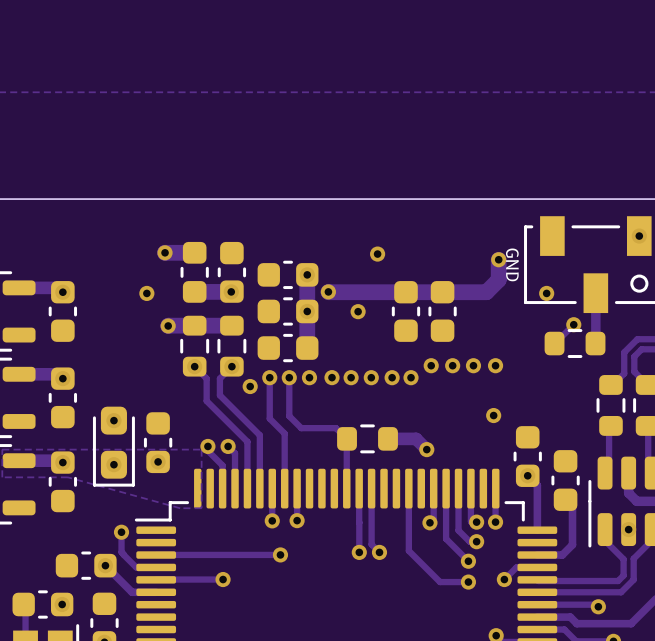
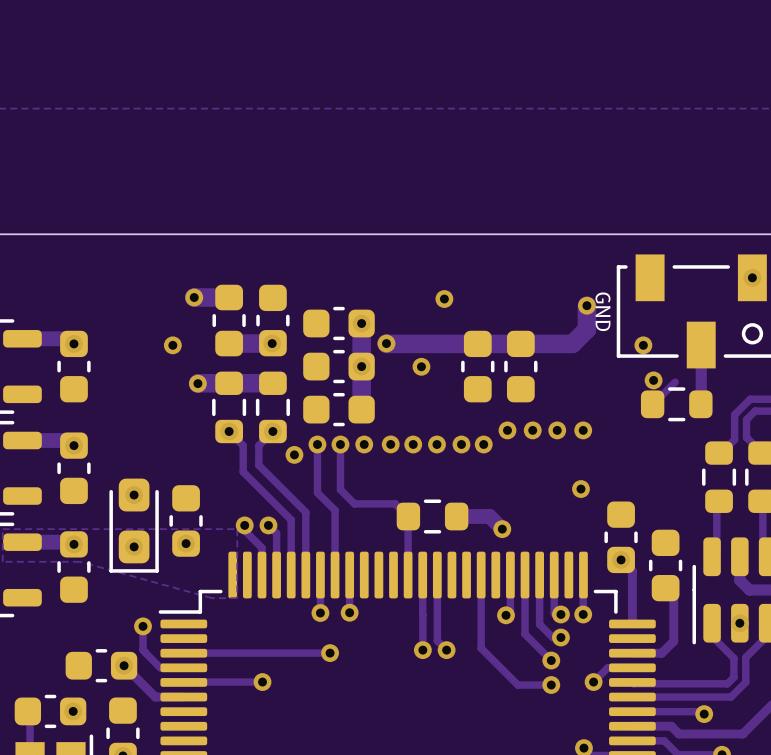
via position: (573, 324) -> (653, 380)

